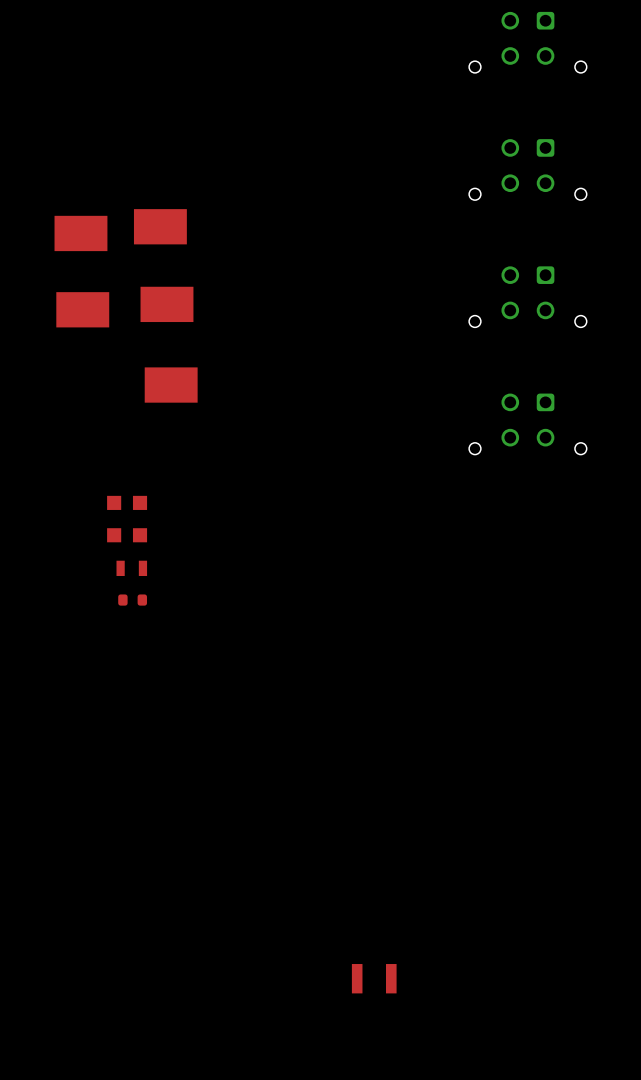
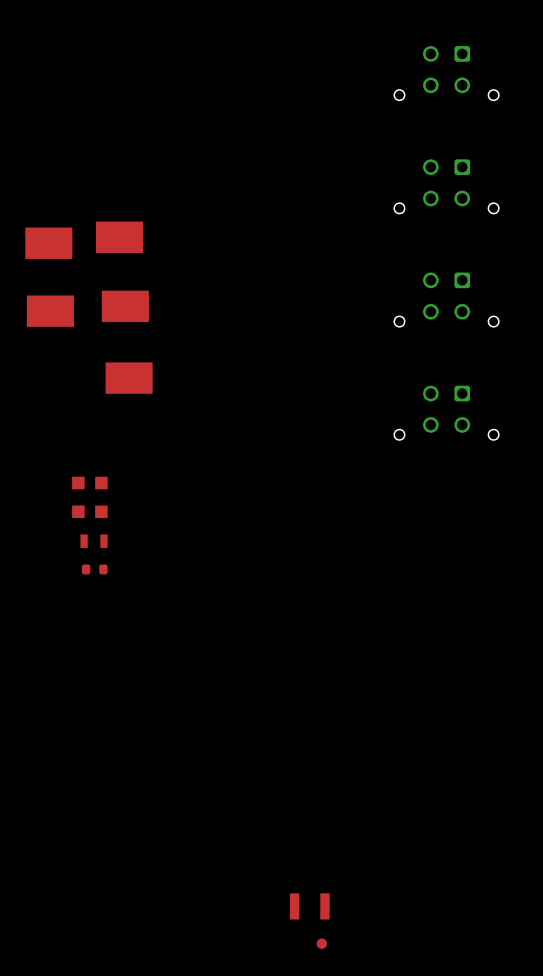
part: none -> (321, 943)

